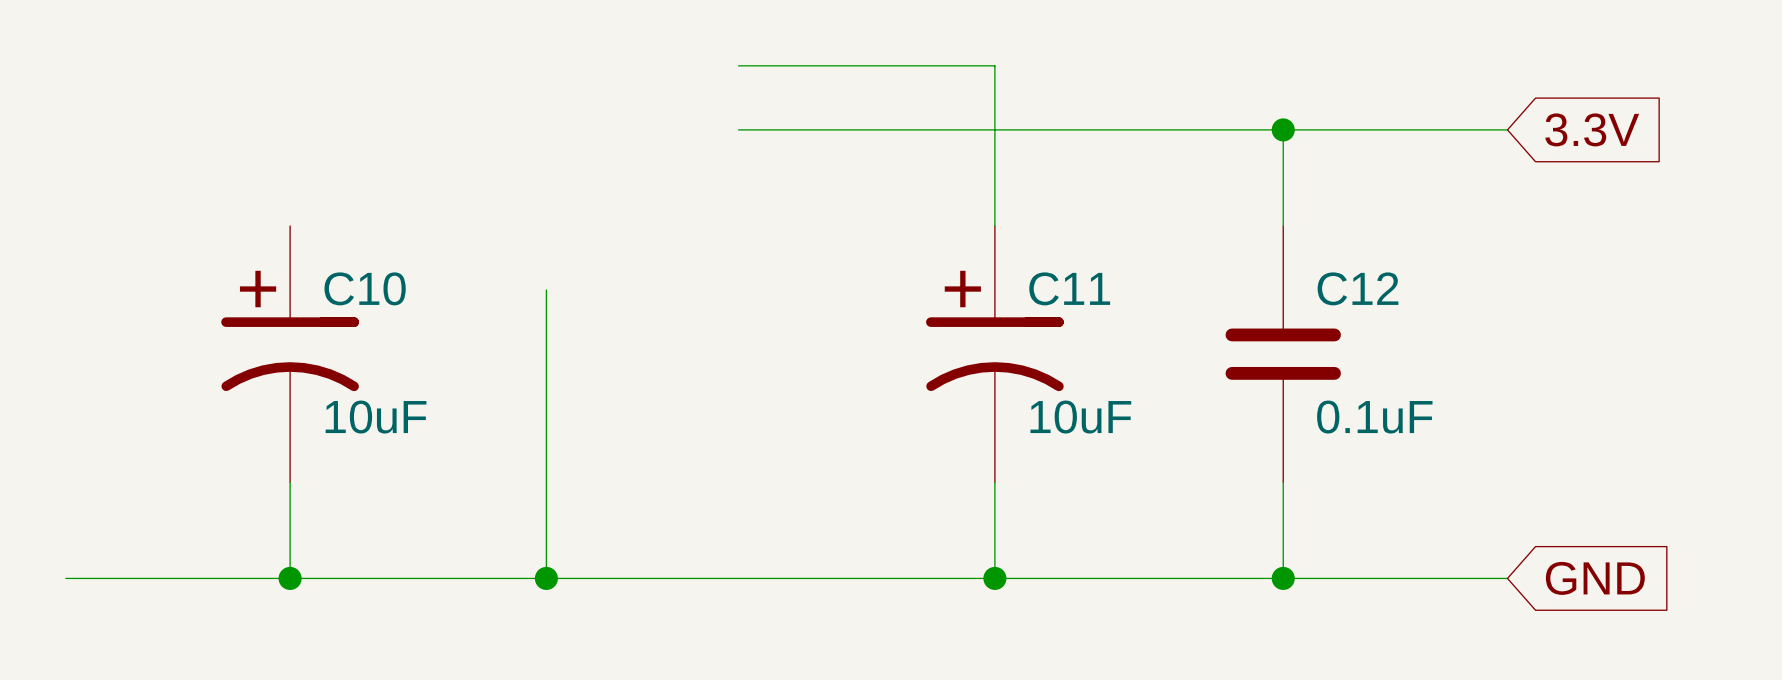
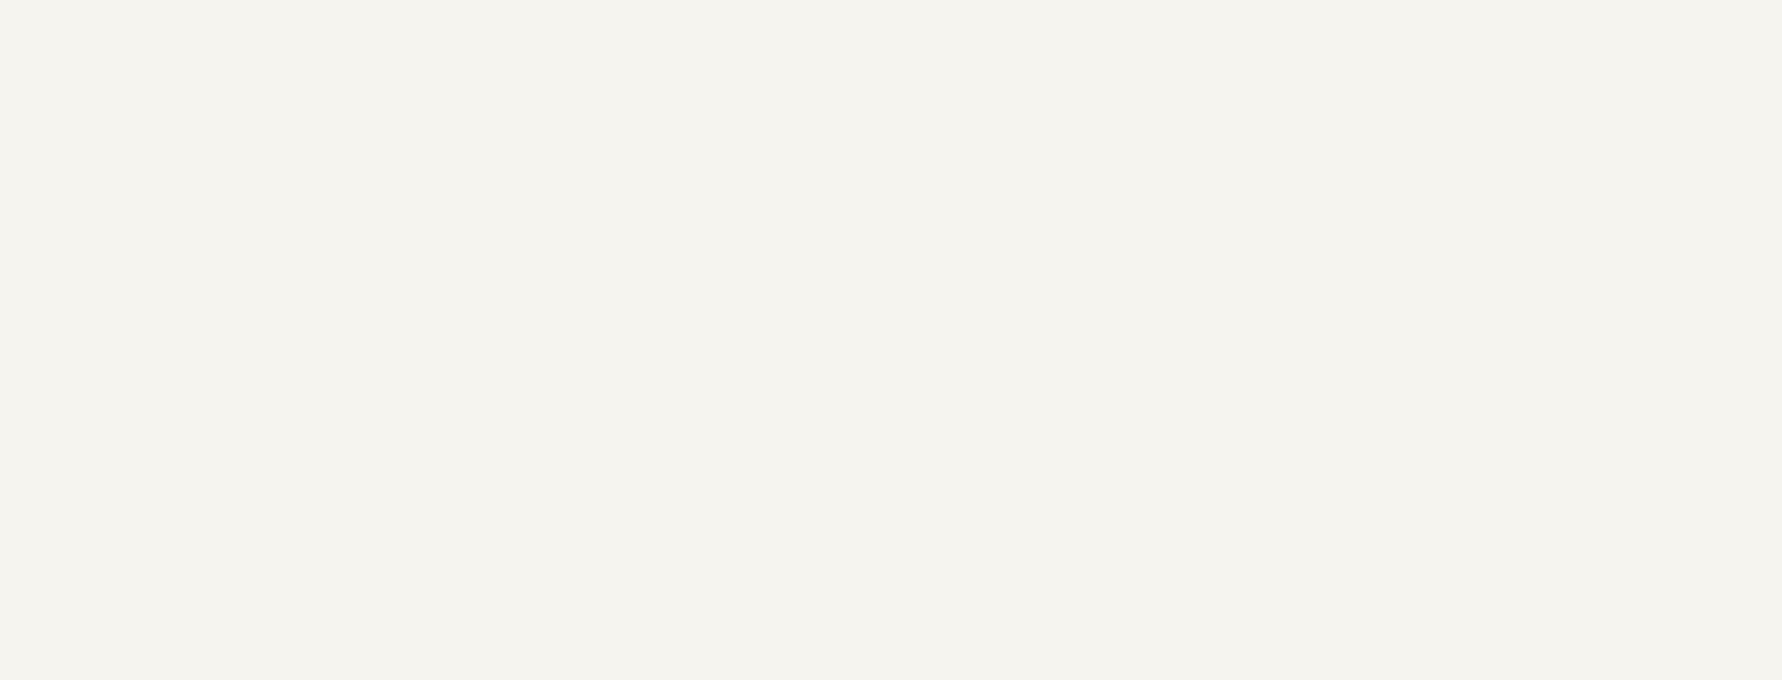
wire: (738, 65) (994, 65) (994, 226) -> none
wire: (738, 129) (1507, 129) -> none
wire: (1283, 129) (1283, 226) -> none
junction: (1283, 129) -> none
global label: 3.3V (1592, 129) -> none
wire: (546, 290) (546, 578) -> none
C10: 10uF (290, 354) -> none
C11: 10uF (994, 354) -> none
C12: 0.1uF (1283, 354) -> none
wire: (290, 482) (290, 578) -> none
wire: (994, 482) (994, 578) -> none
wire: (1283, 482) (1283, 578) -> none
wire: (65, 578) (1507, 578) -> none
junction: (290, 578) -> none
junction: (546, 578) -> none
junction: (994, 578) -> none
junction: (1283, 578) -> none
global label: GND (1595, 578) -> none

